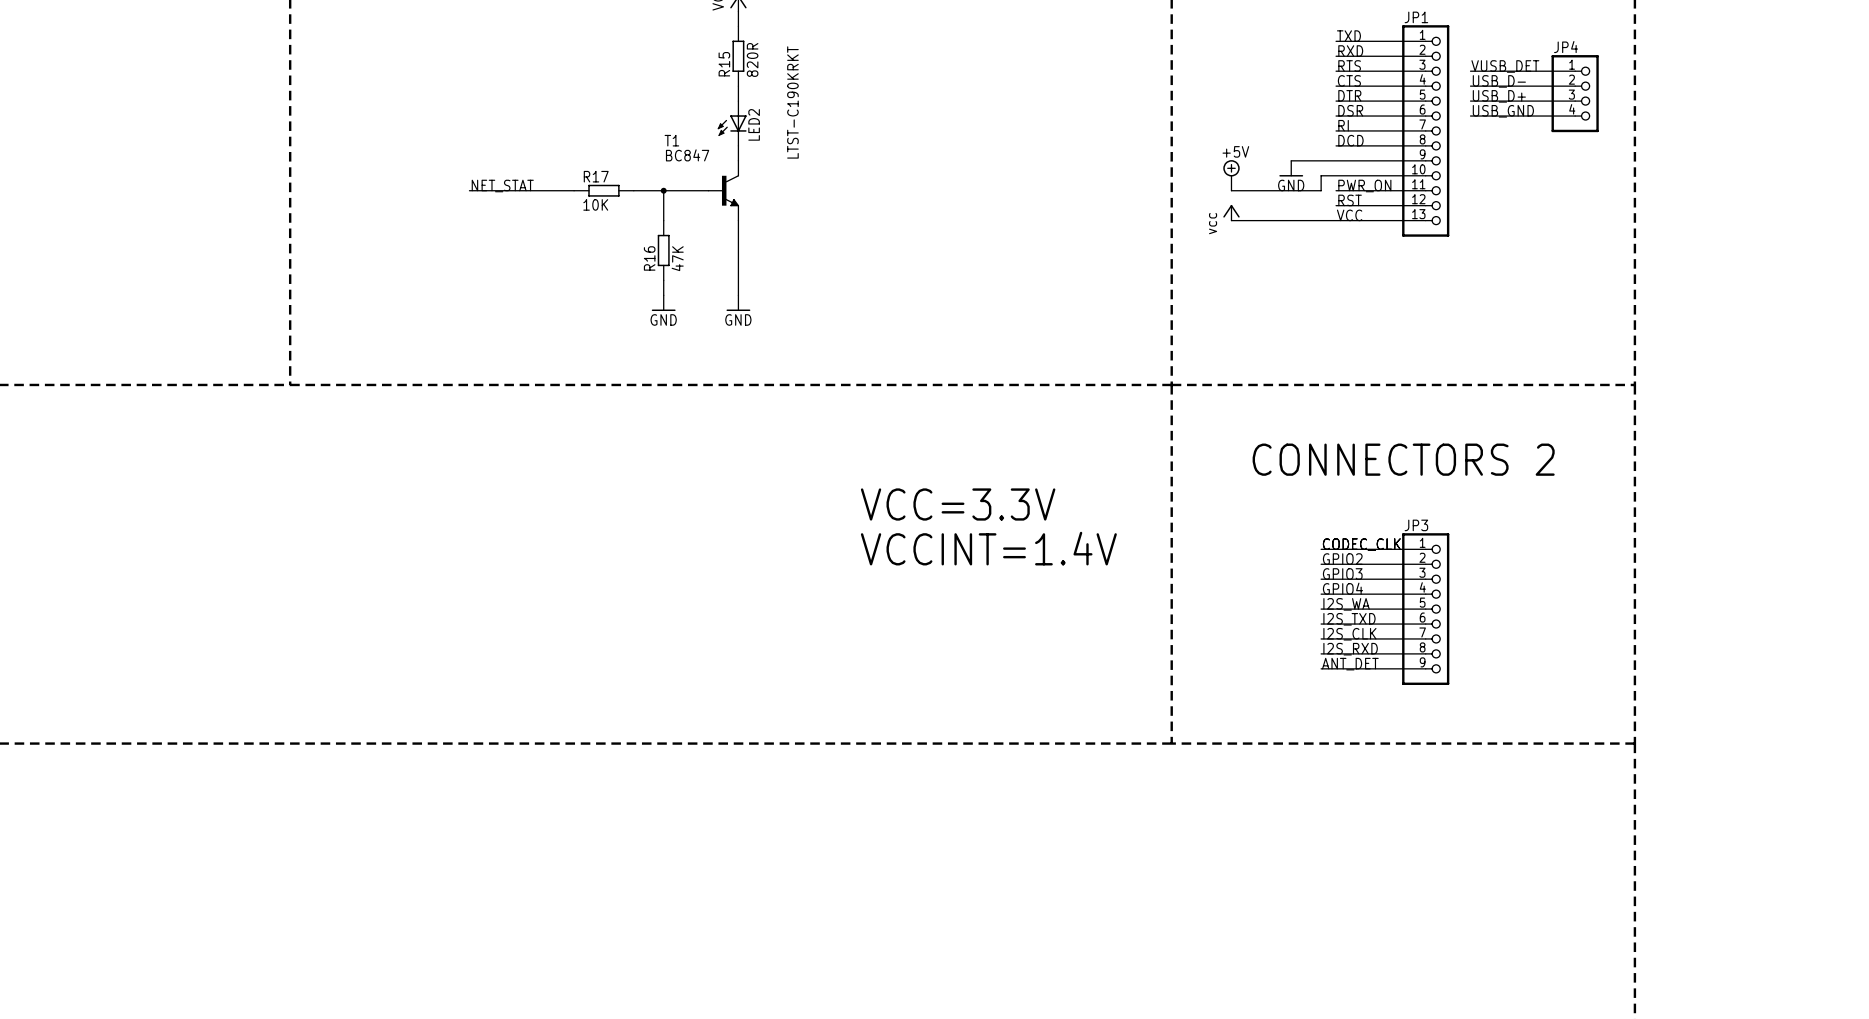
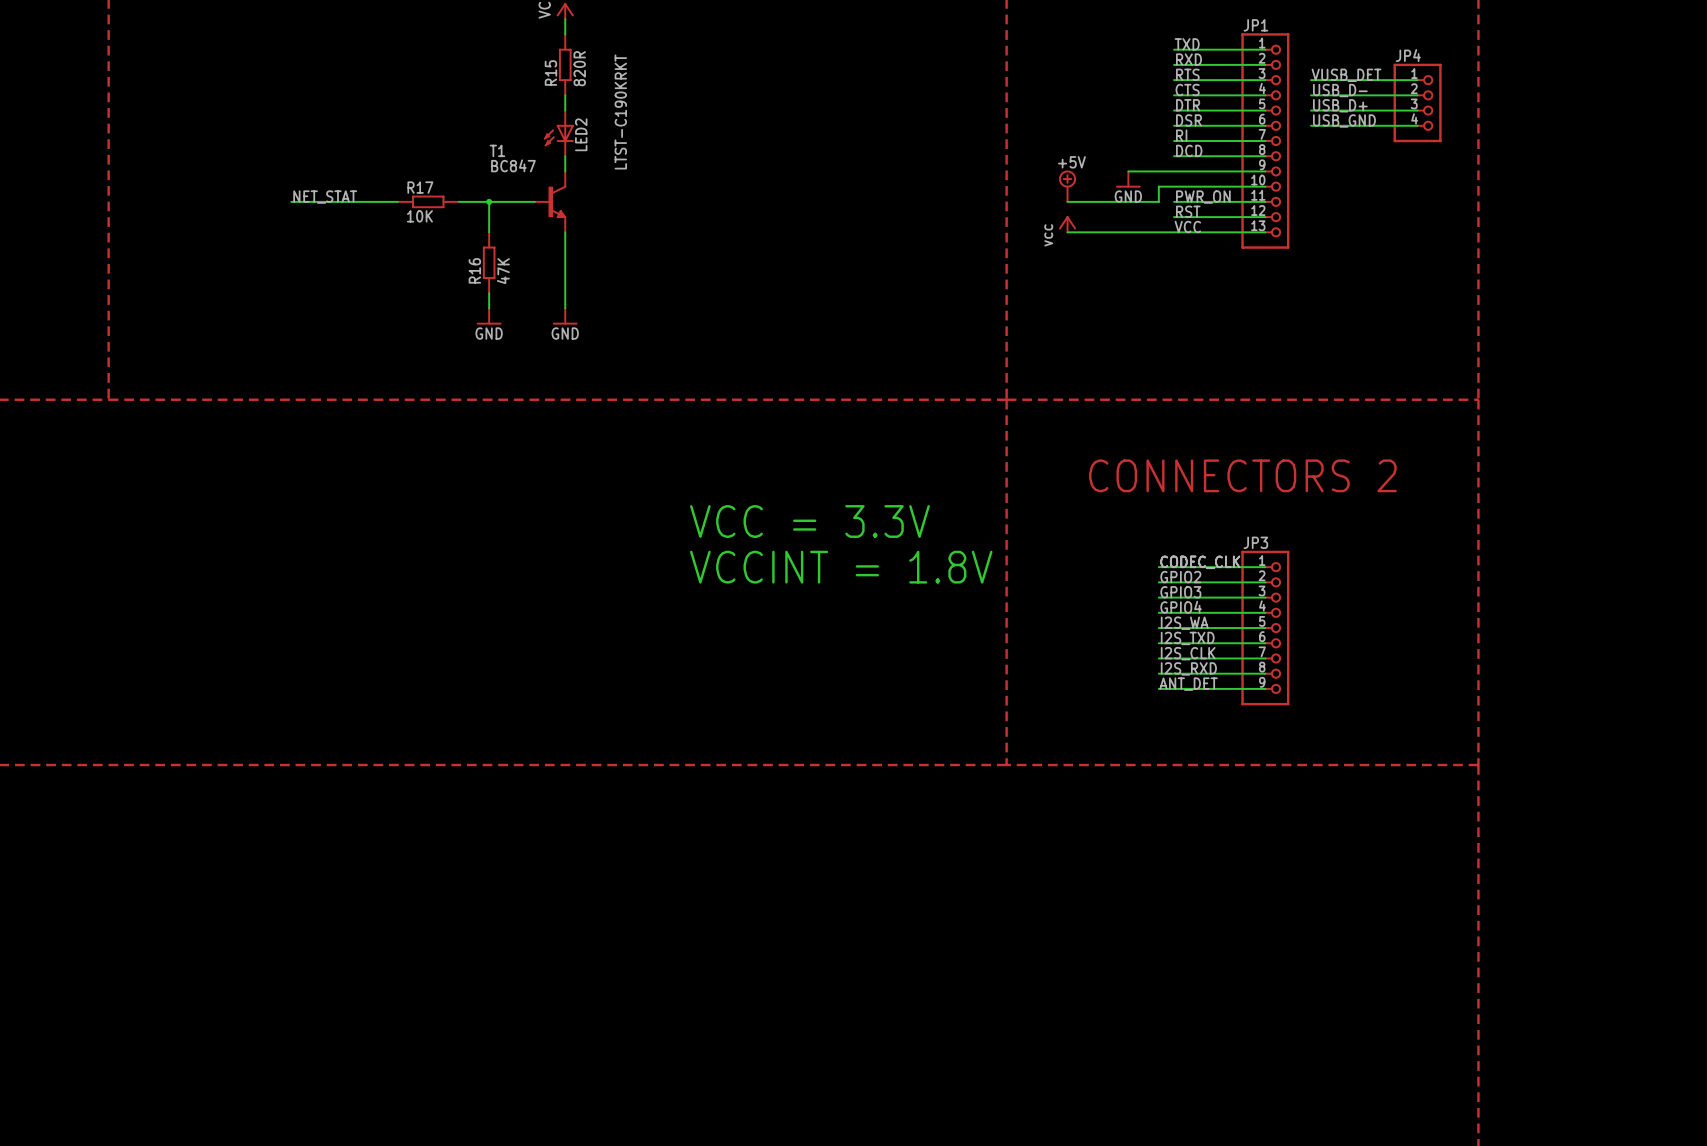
text: VCC=3.3V (958, 504) -> VCC = 3.3V (809, 521)
text: VCCINT=1.4V (988, 548) -> VCCINT = 1.8V (841, 567)

